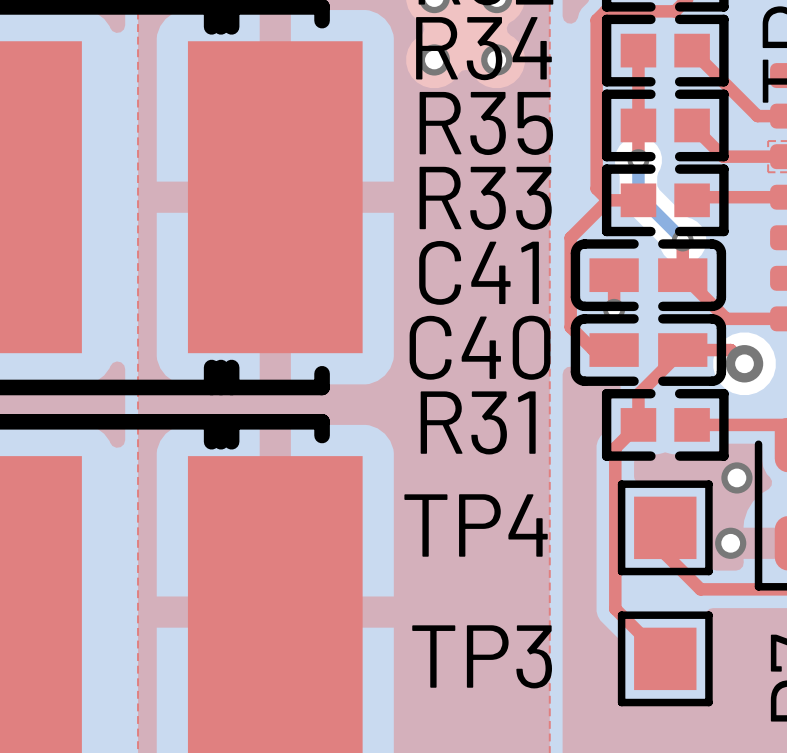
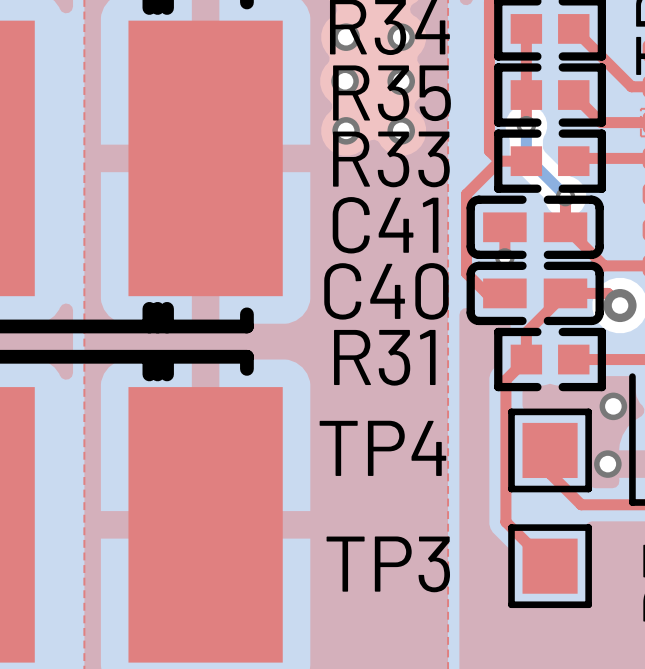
via: none -> (345, 81)
via: none -> (401, 81)
via: none -> (346, 130)
via: none -> (401, 130)

